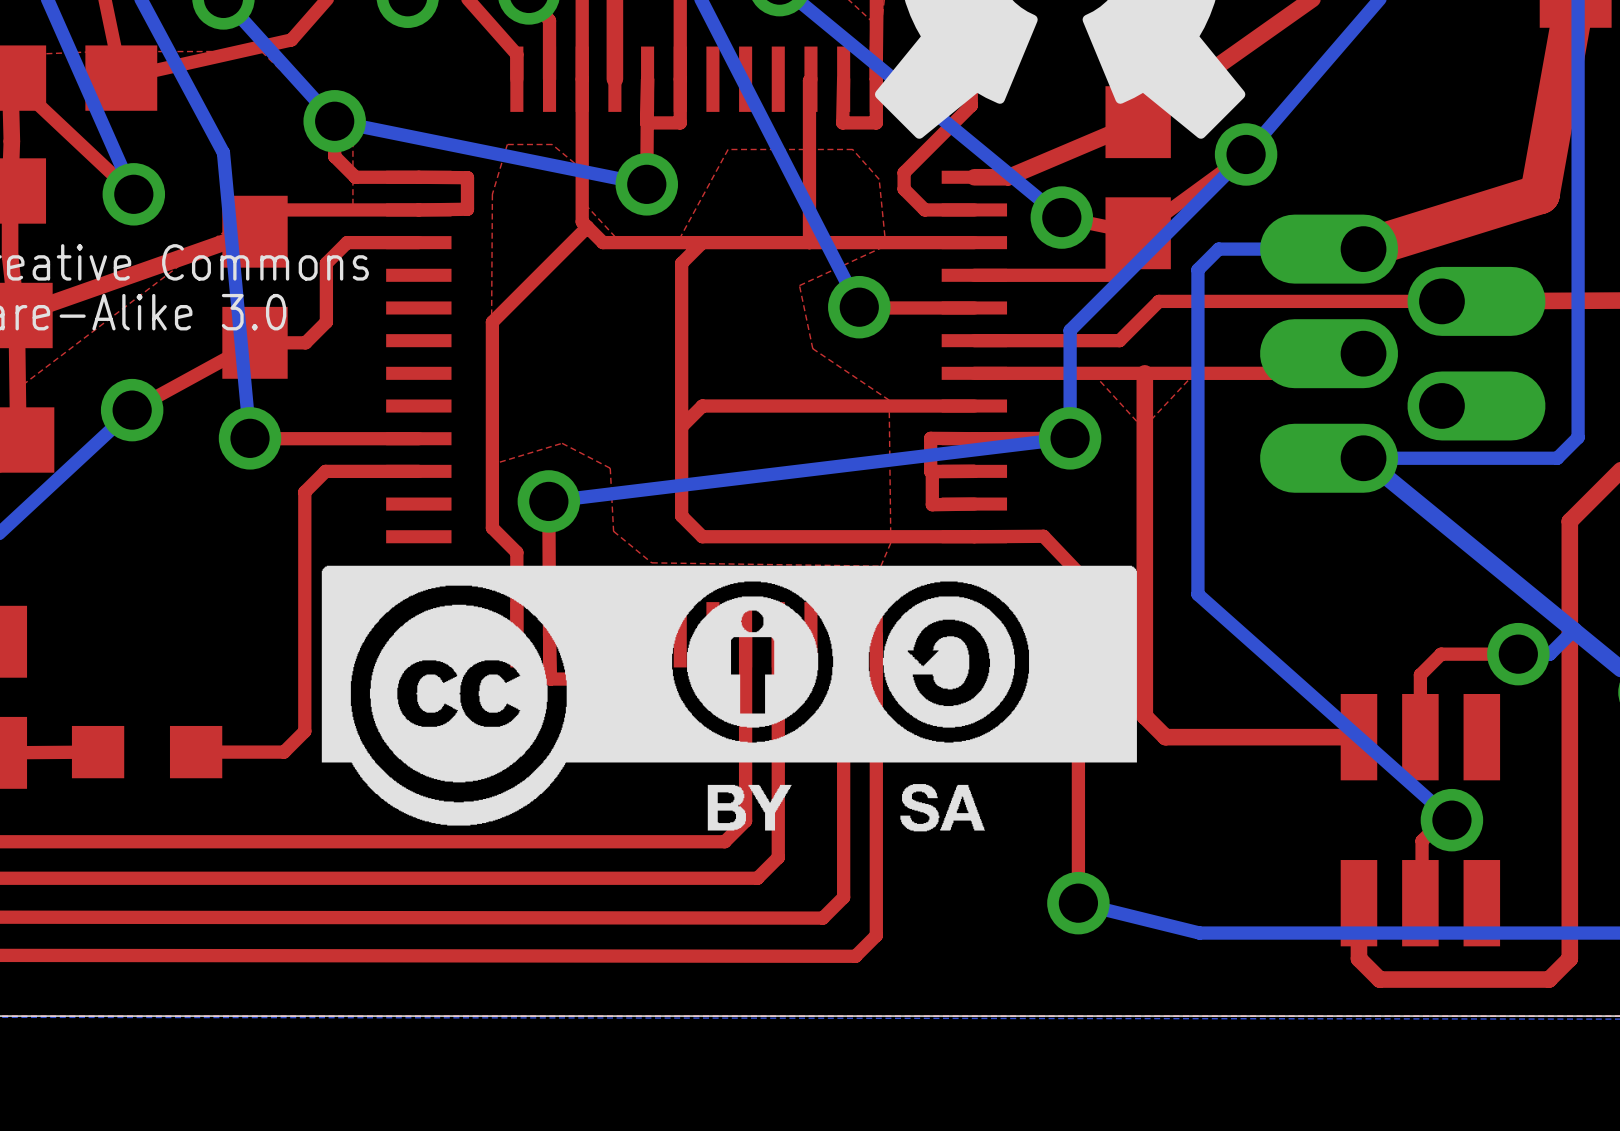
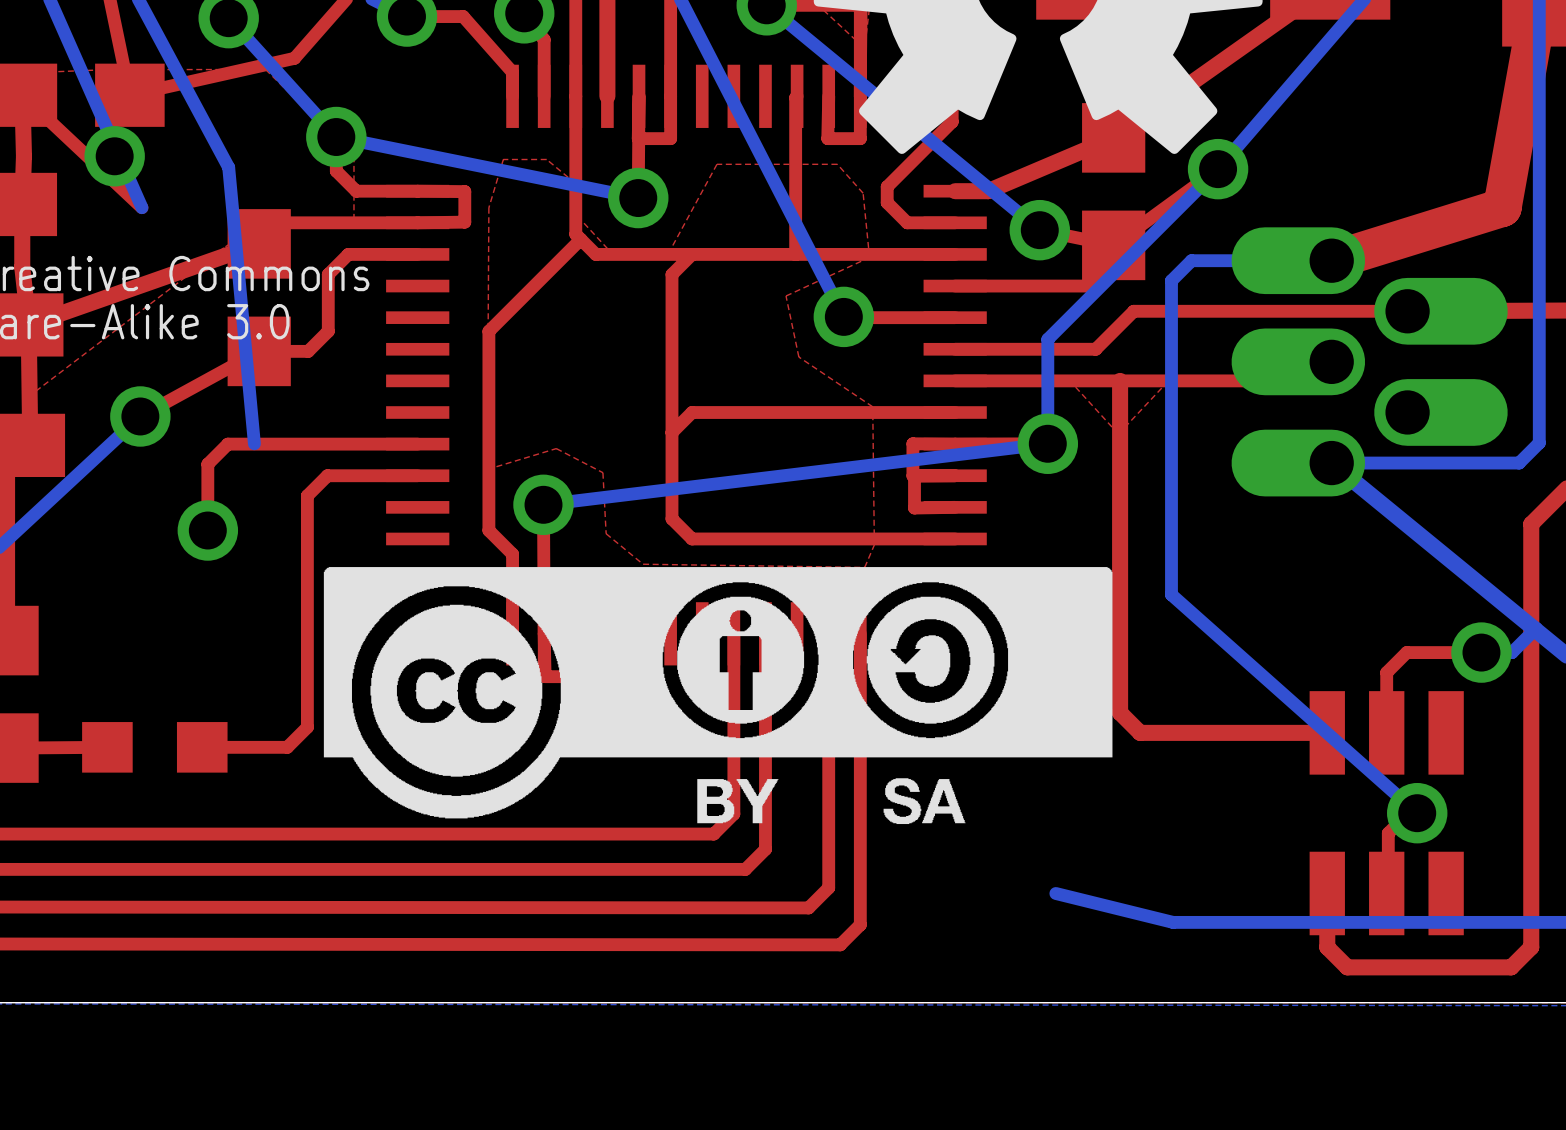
via position: (133, 194) -> (114, 156)
top track: none -> (254, 444) (227, 444) (207, 464) (207, 530)
via position: (250, 438) -> (207, 530)
top track: (974, 536) (1043, 536) (1078, 572) (1078, 903) -> none
via: (1078, 903) -> none

